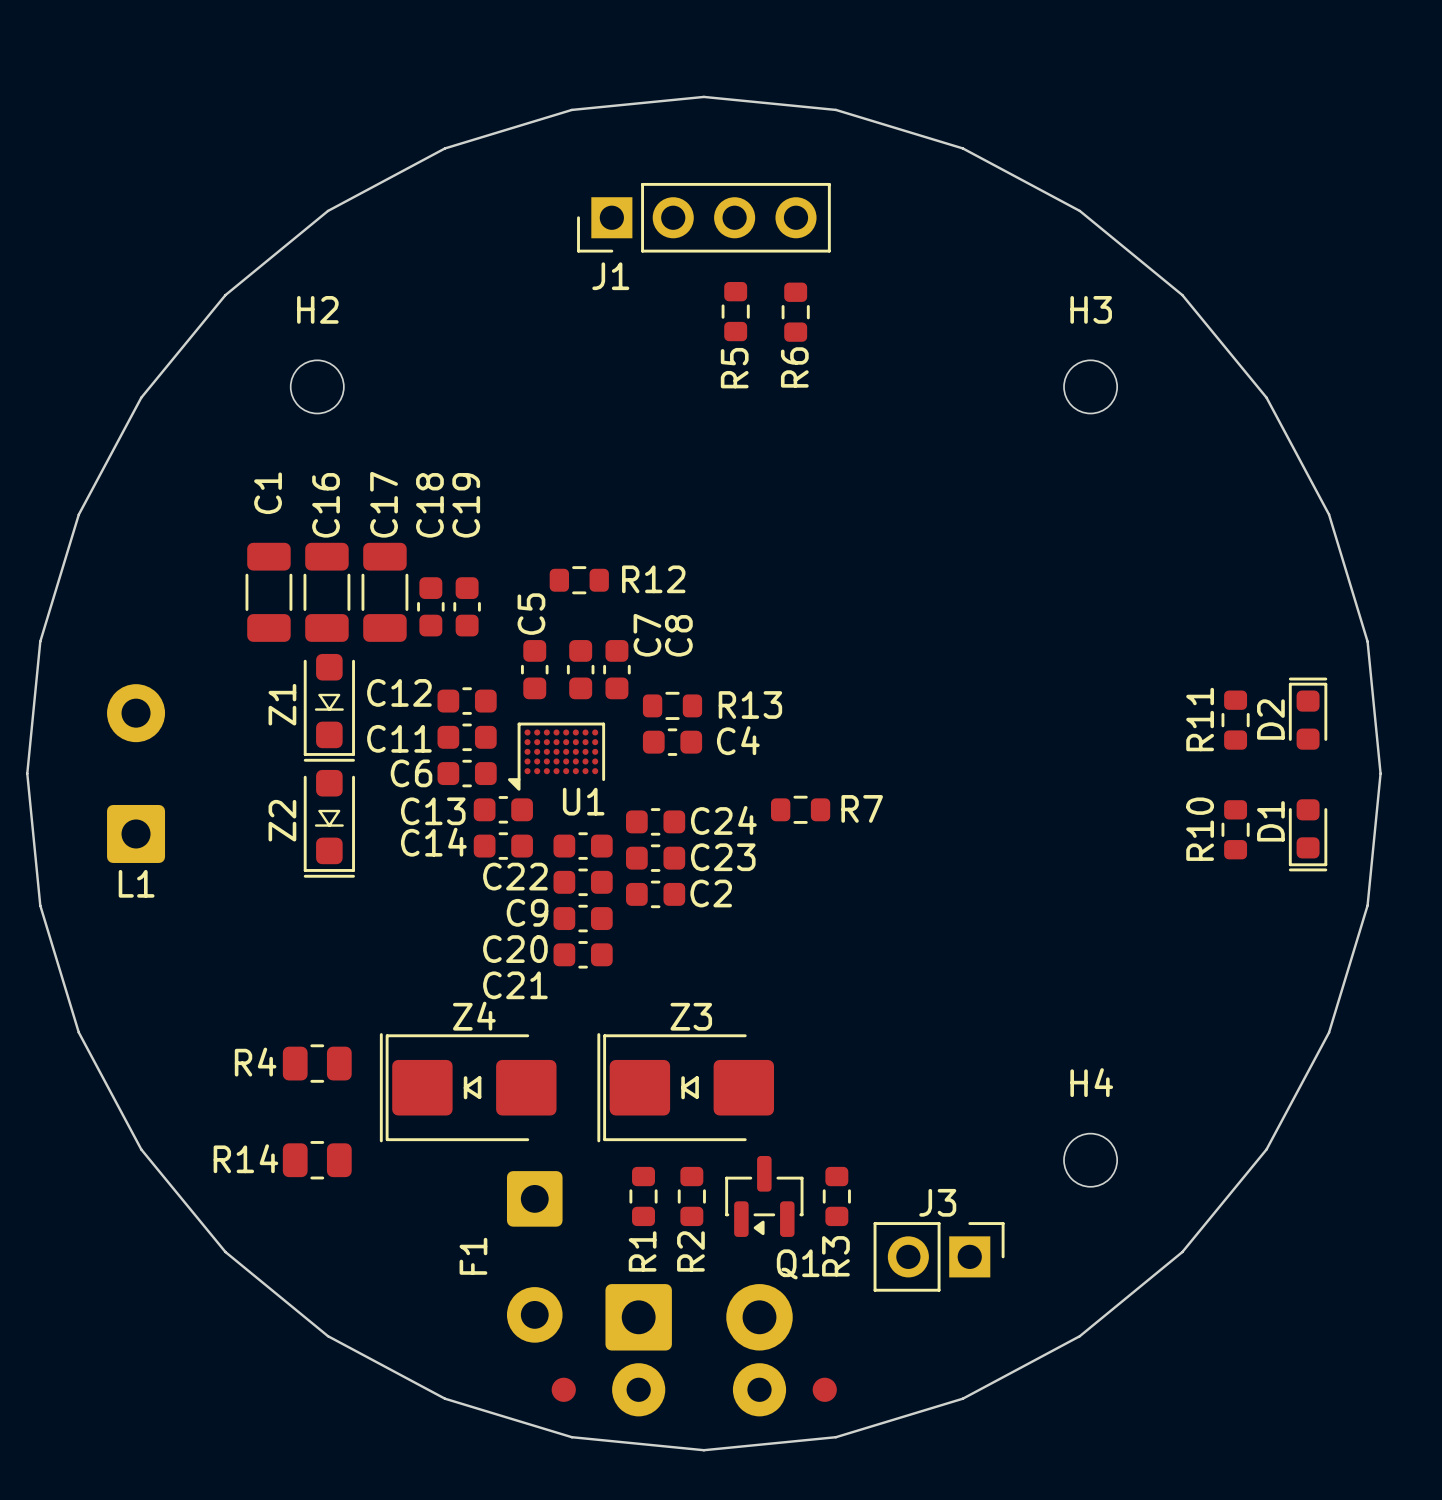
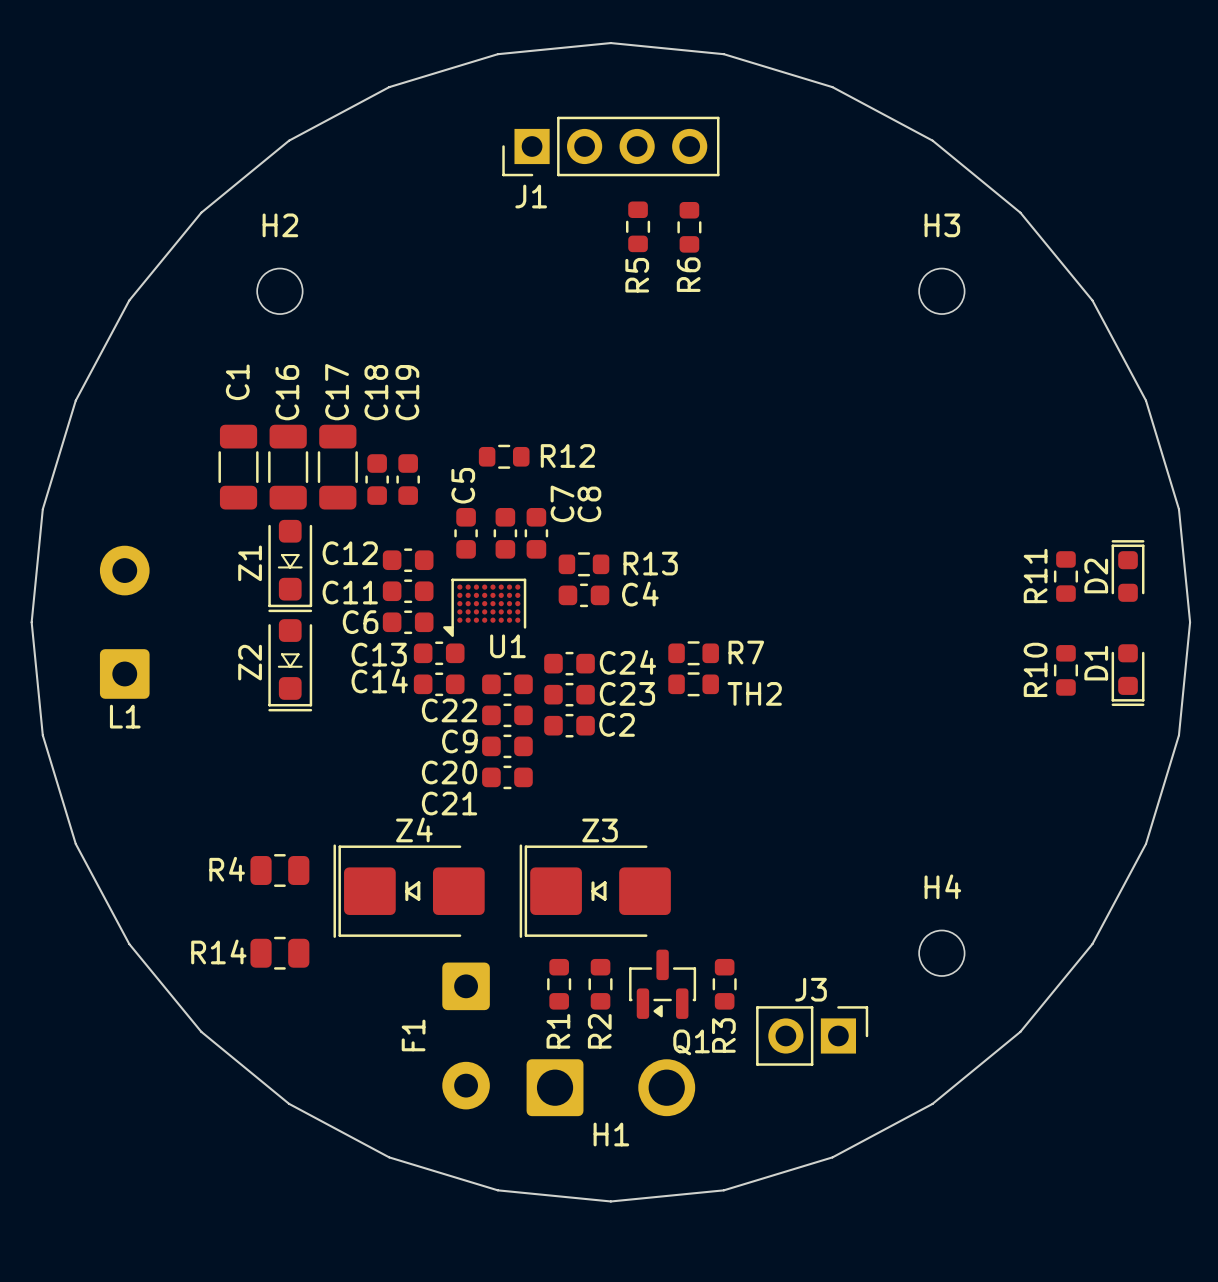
TH2: none -> (693, 684)
H1: none -> (610, 1087)
part: (699, 1350) -> none
part: (563, 1389) -> none
part: (824, 1389) -> none

